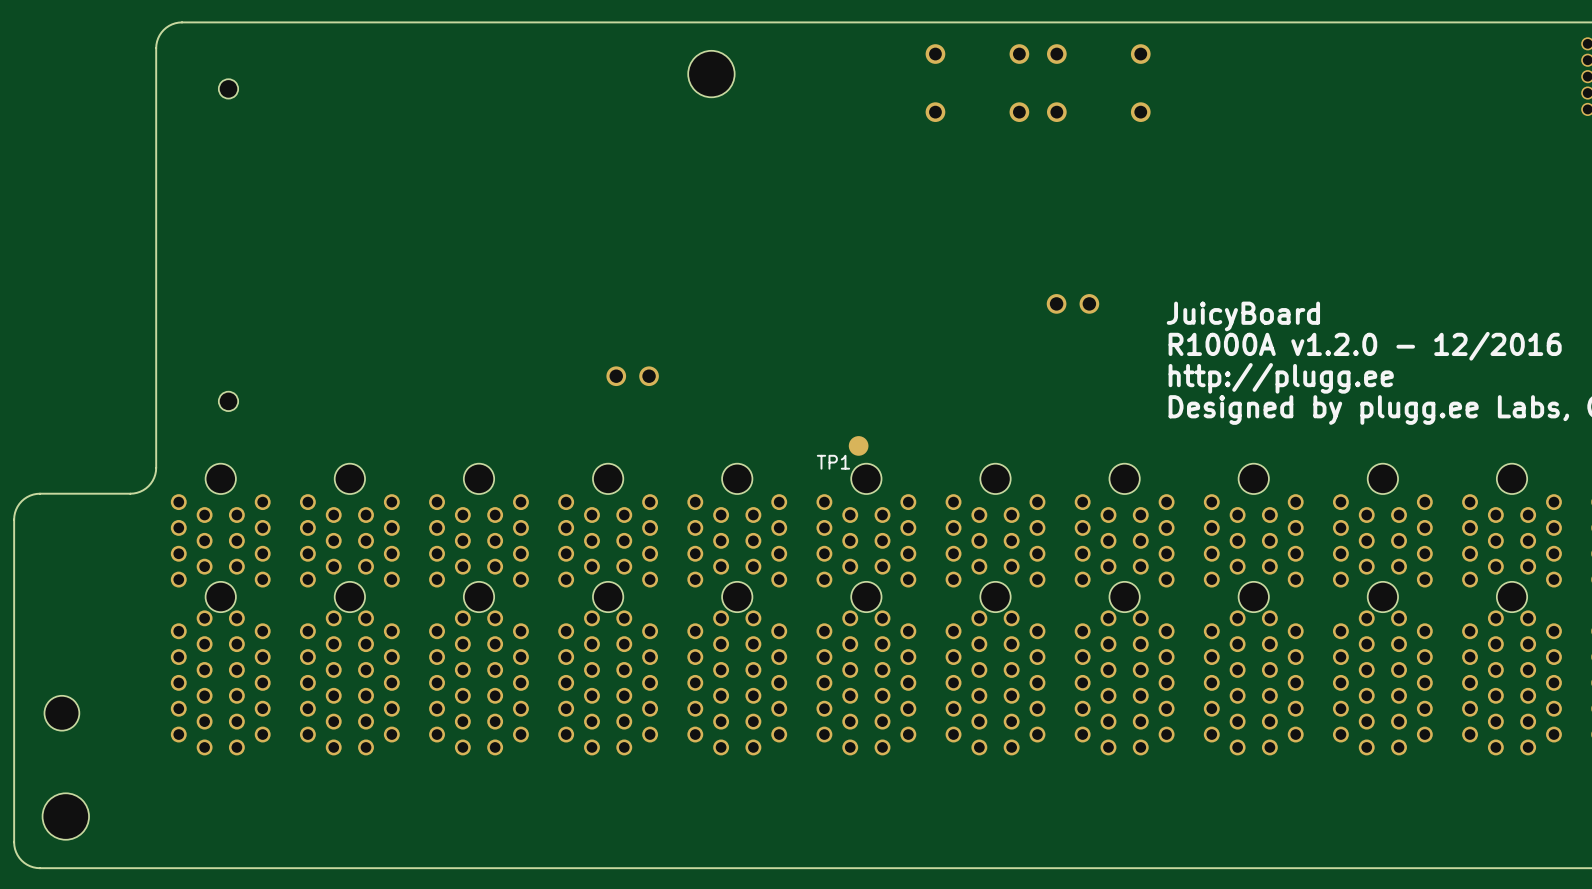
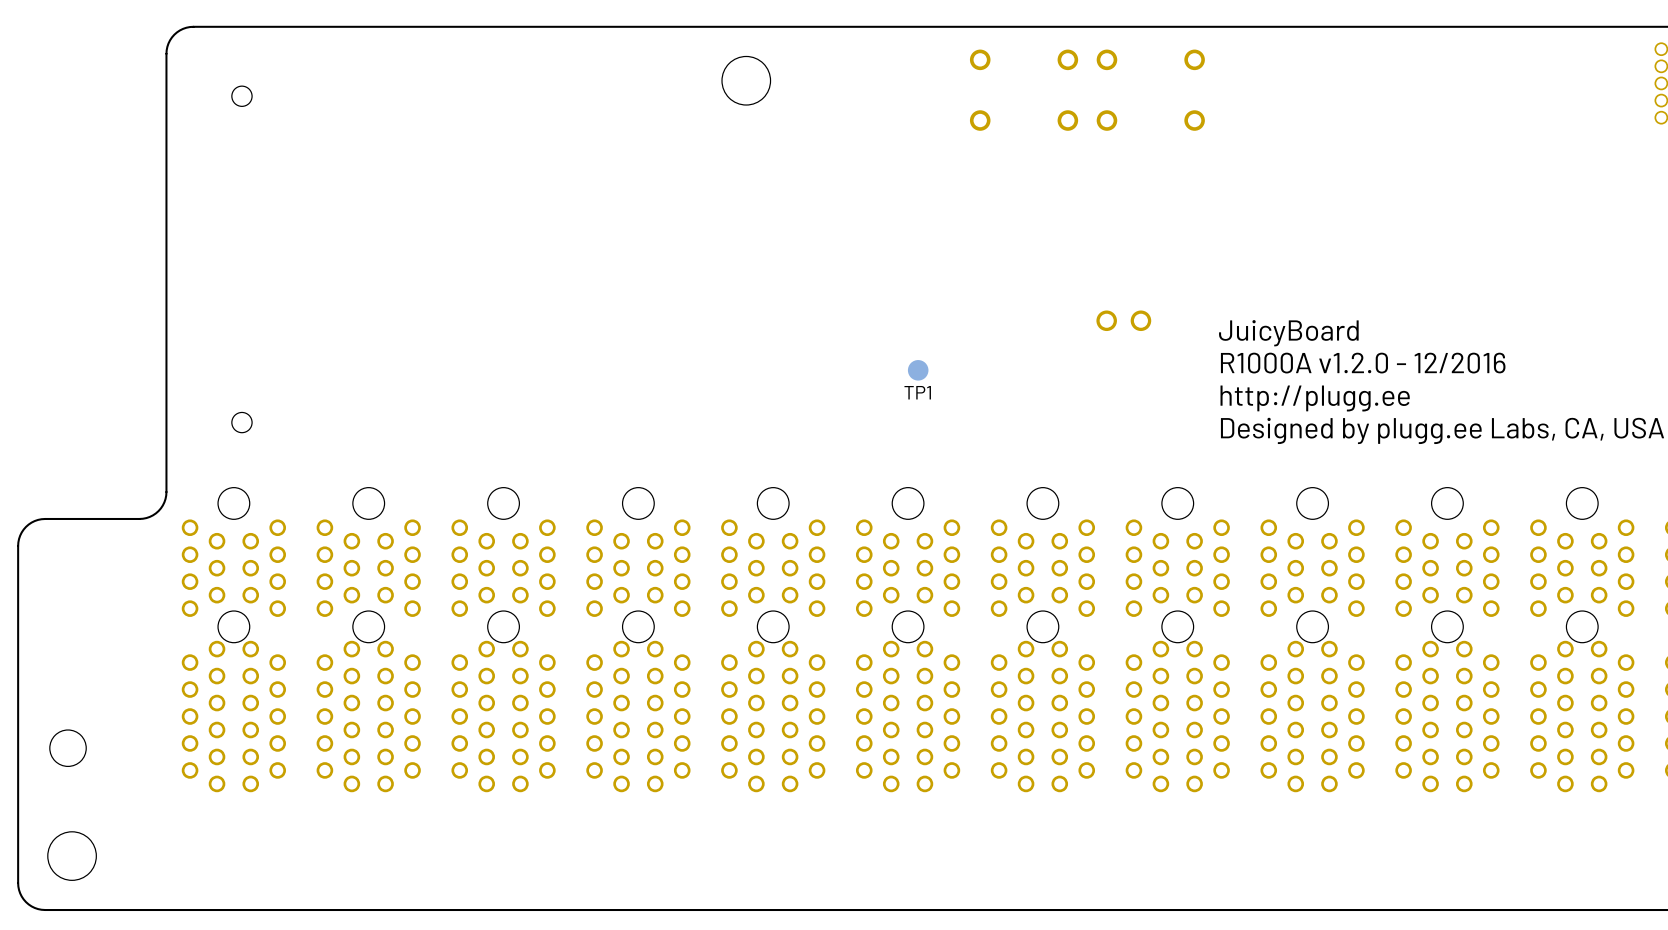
part: (632, 376) -> none
TP1 position: (858, 445) -> (918, 370)
TP1 name position: TP1 (833, 462) -> TP1 (917, 392)

